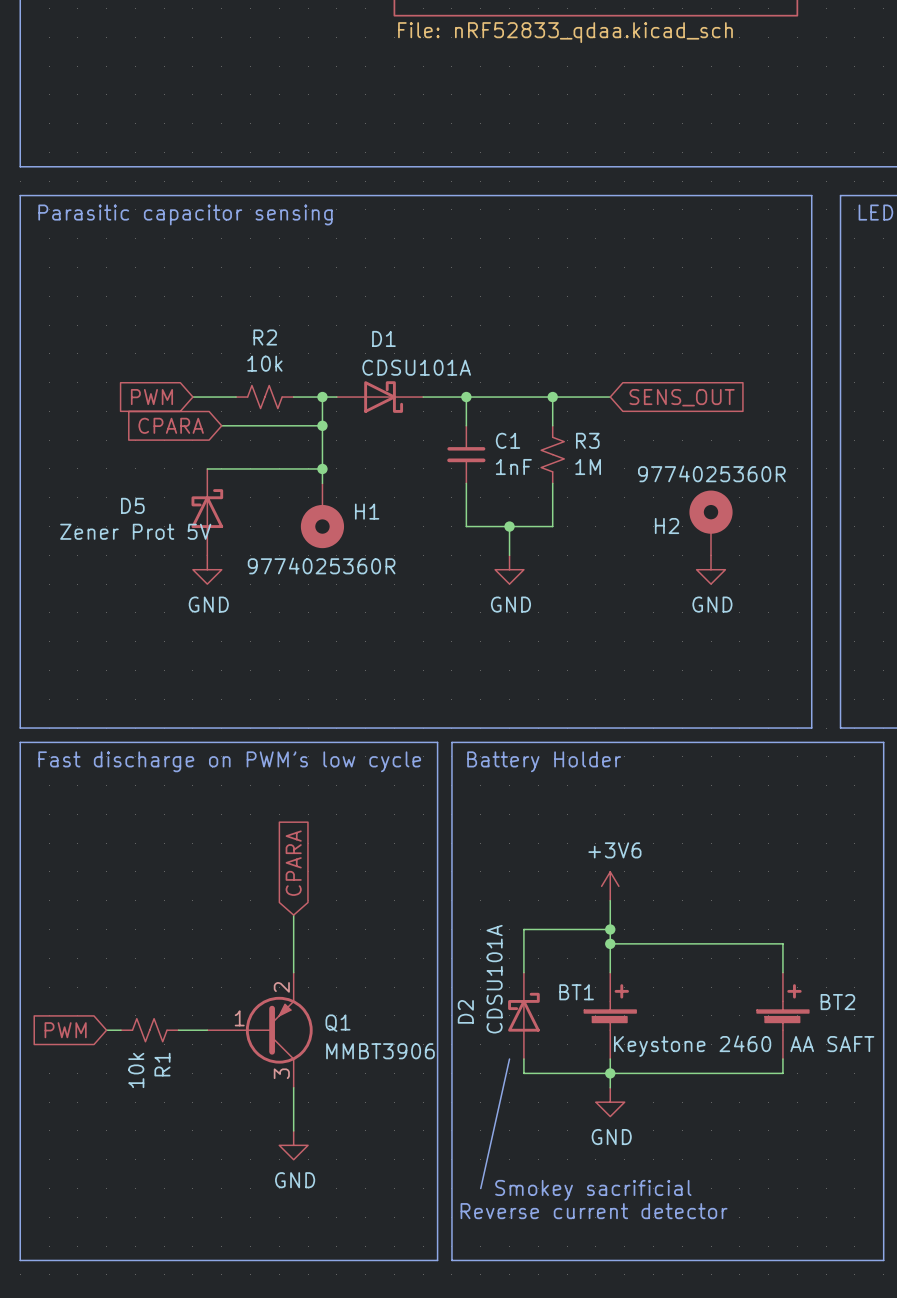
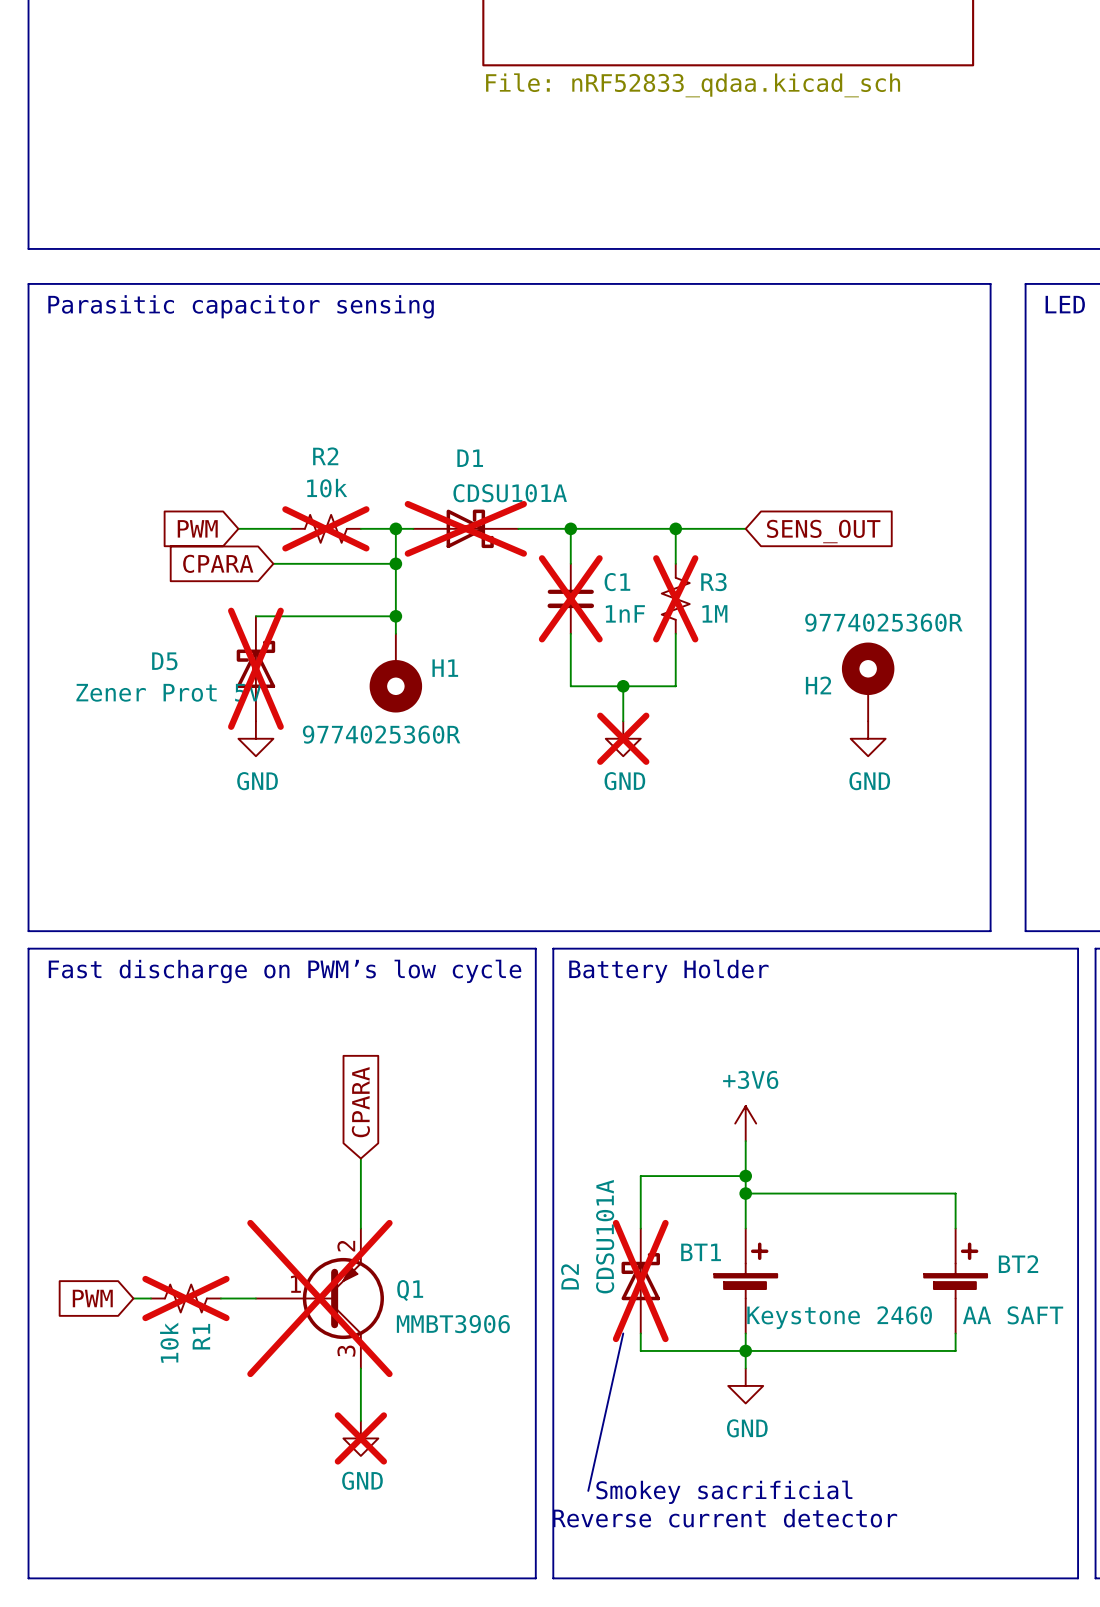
R2 do-not-place cross: none -> (325, 528)
D1 do-not-place cross: none -> (465, 528)
C1 do-not-place cross: none -> (570, 598)
R3 do-not-place cross: none -> (675, 598)
D5 do-not-place cross: none -> (255, 668)
power symbol do-not-place cross: none -> (623, 738)
D2 do-not-place cross: none -> (640, 1281)
R1 do-not-place cross: none -> (185, 1298)
Q1 do-not-place cross: none -> (319, 1298)
power symbol do-not-place cross: none -> (360, 1438)

